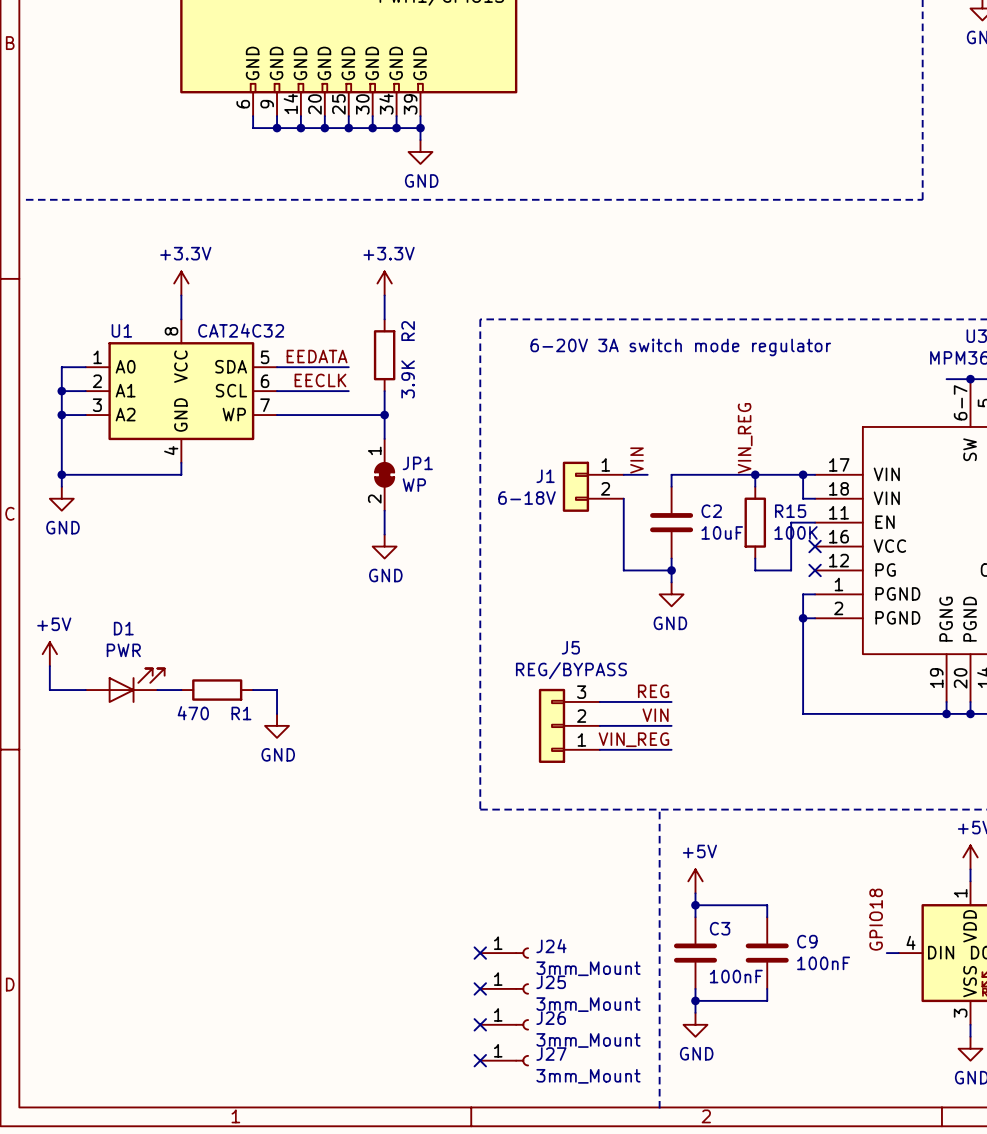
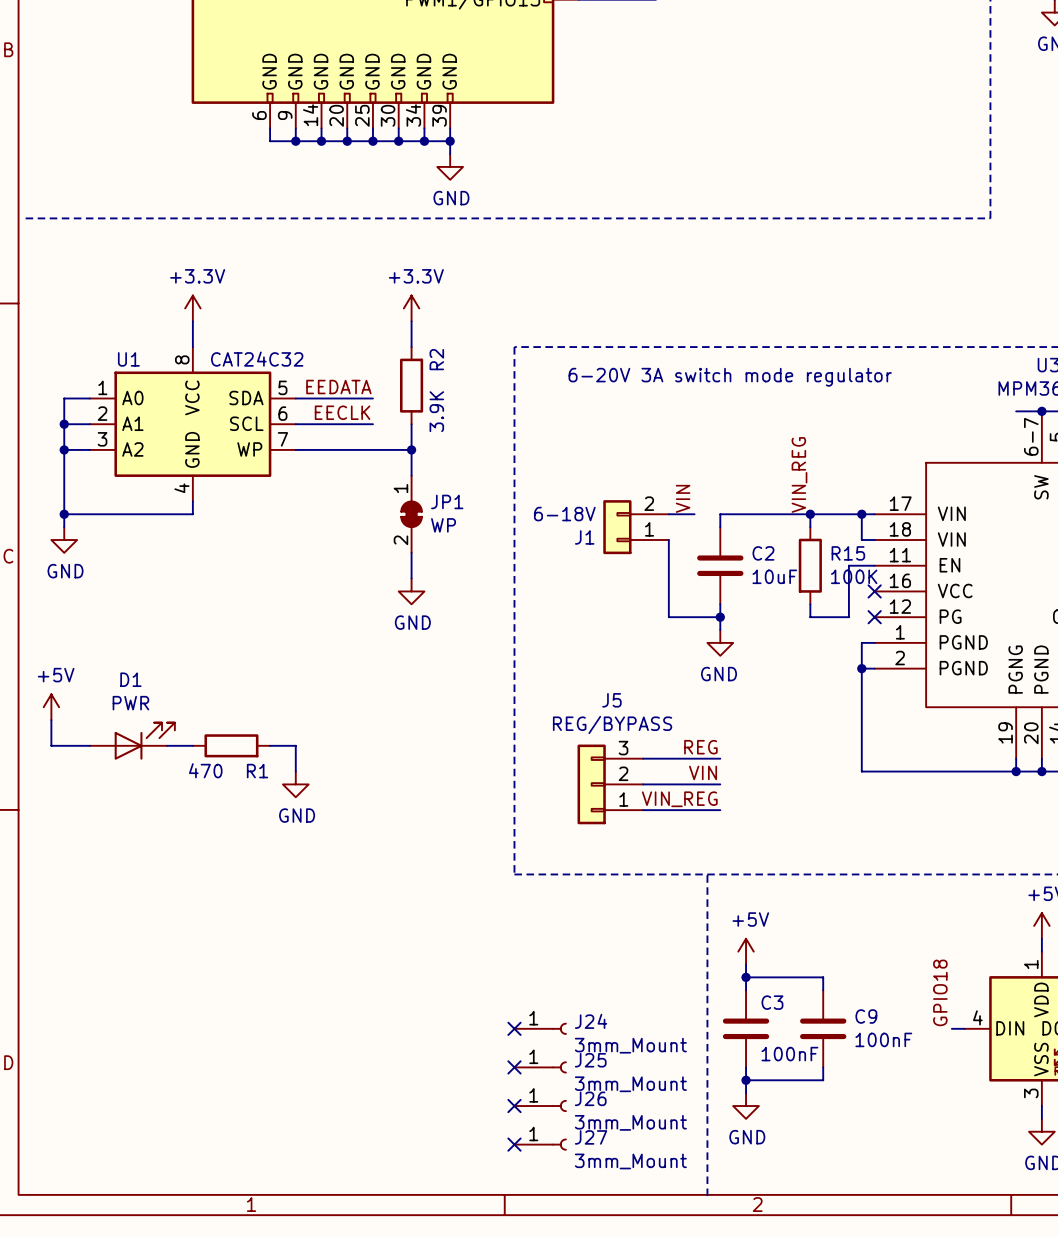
J1 flip: as is (575, 486) -> up-down (617, 527)

